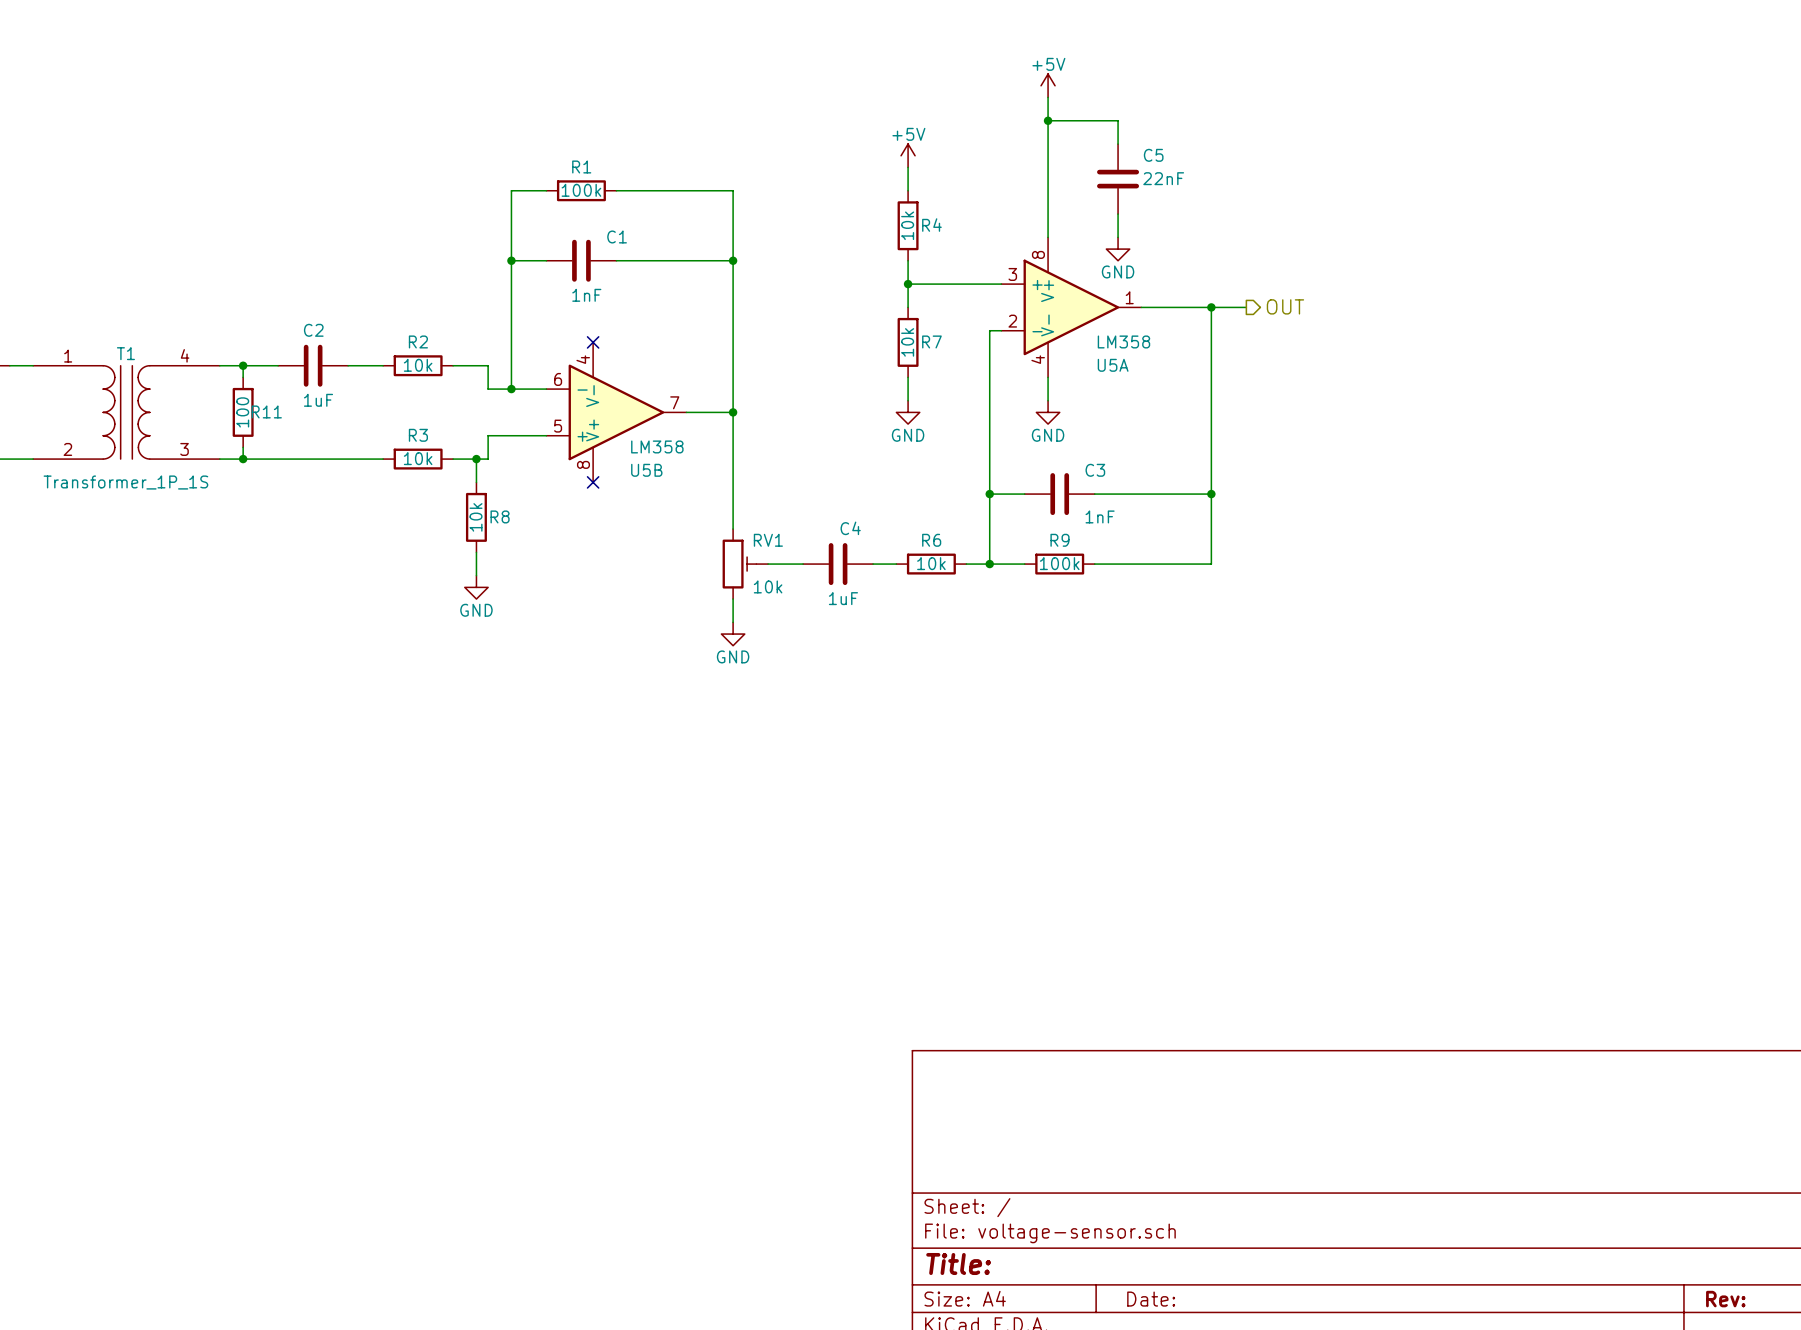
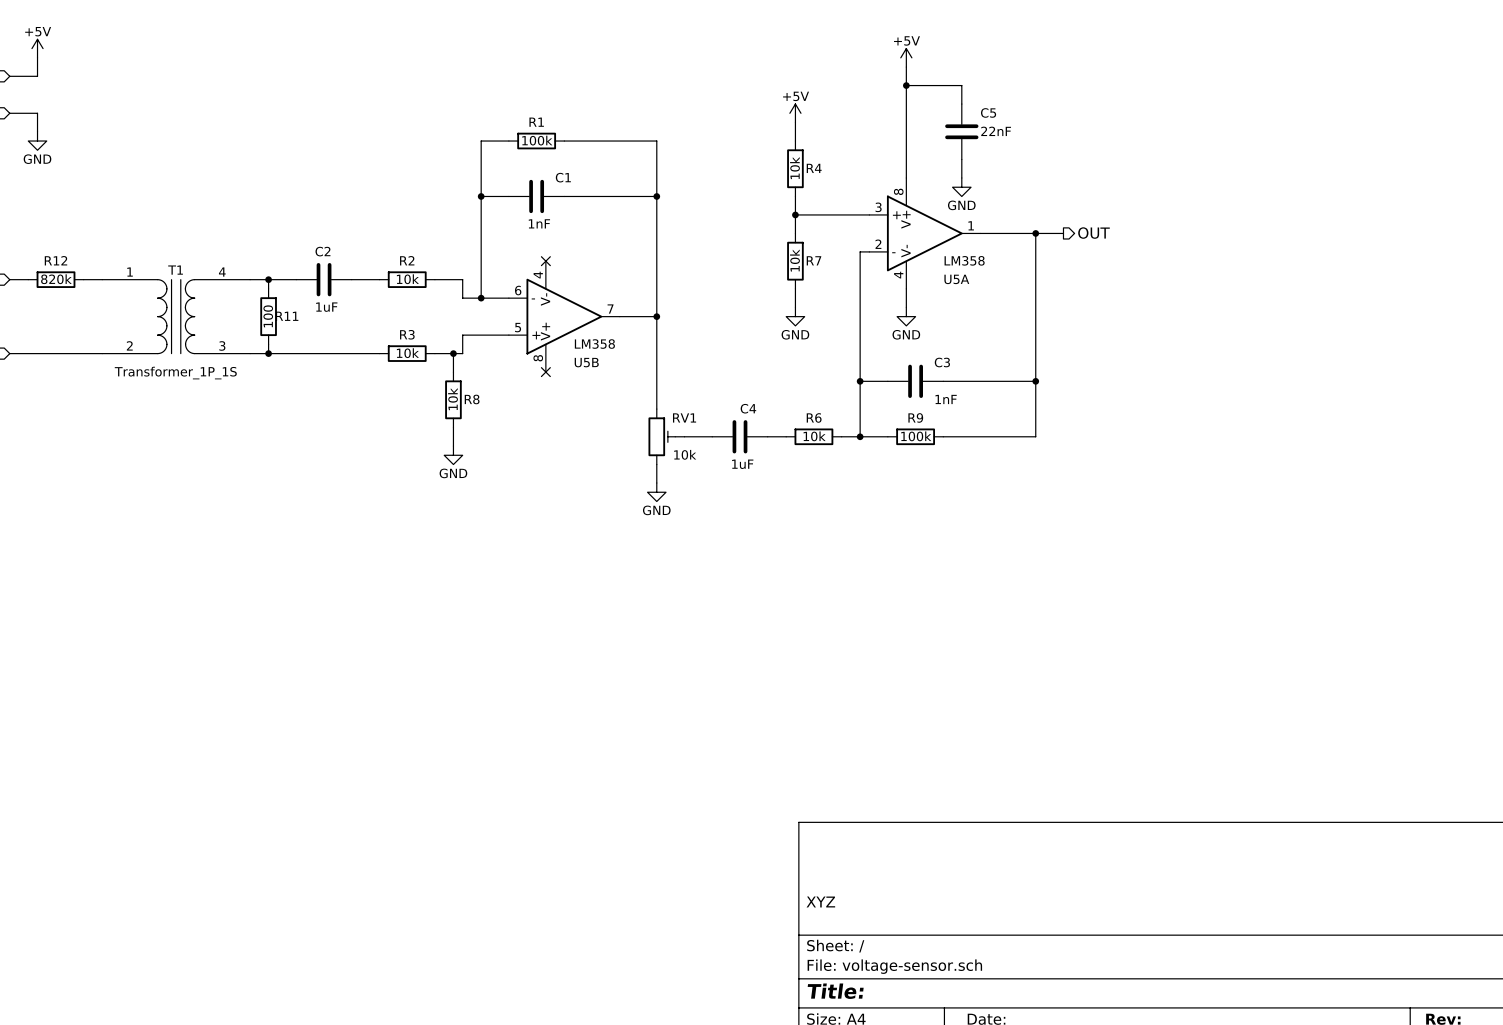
title block: none -> XYZ (820, 902)

